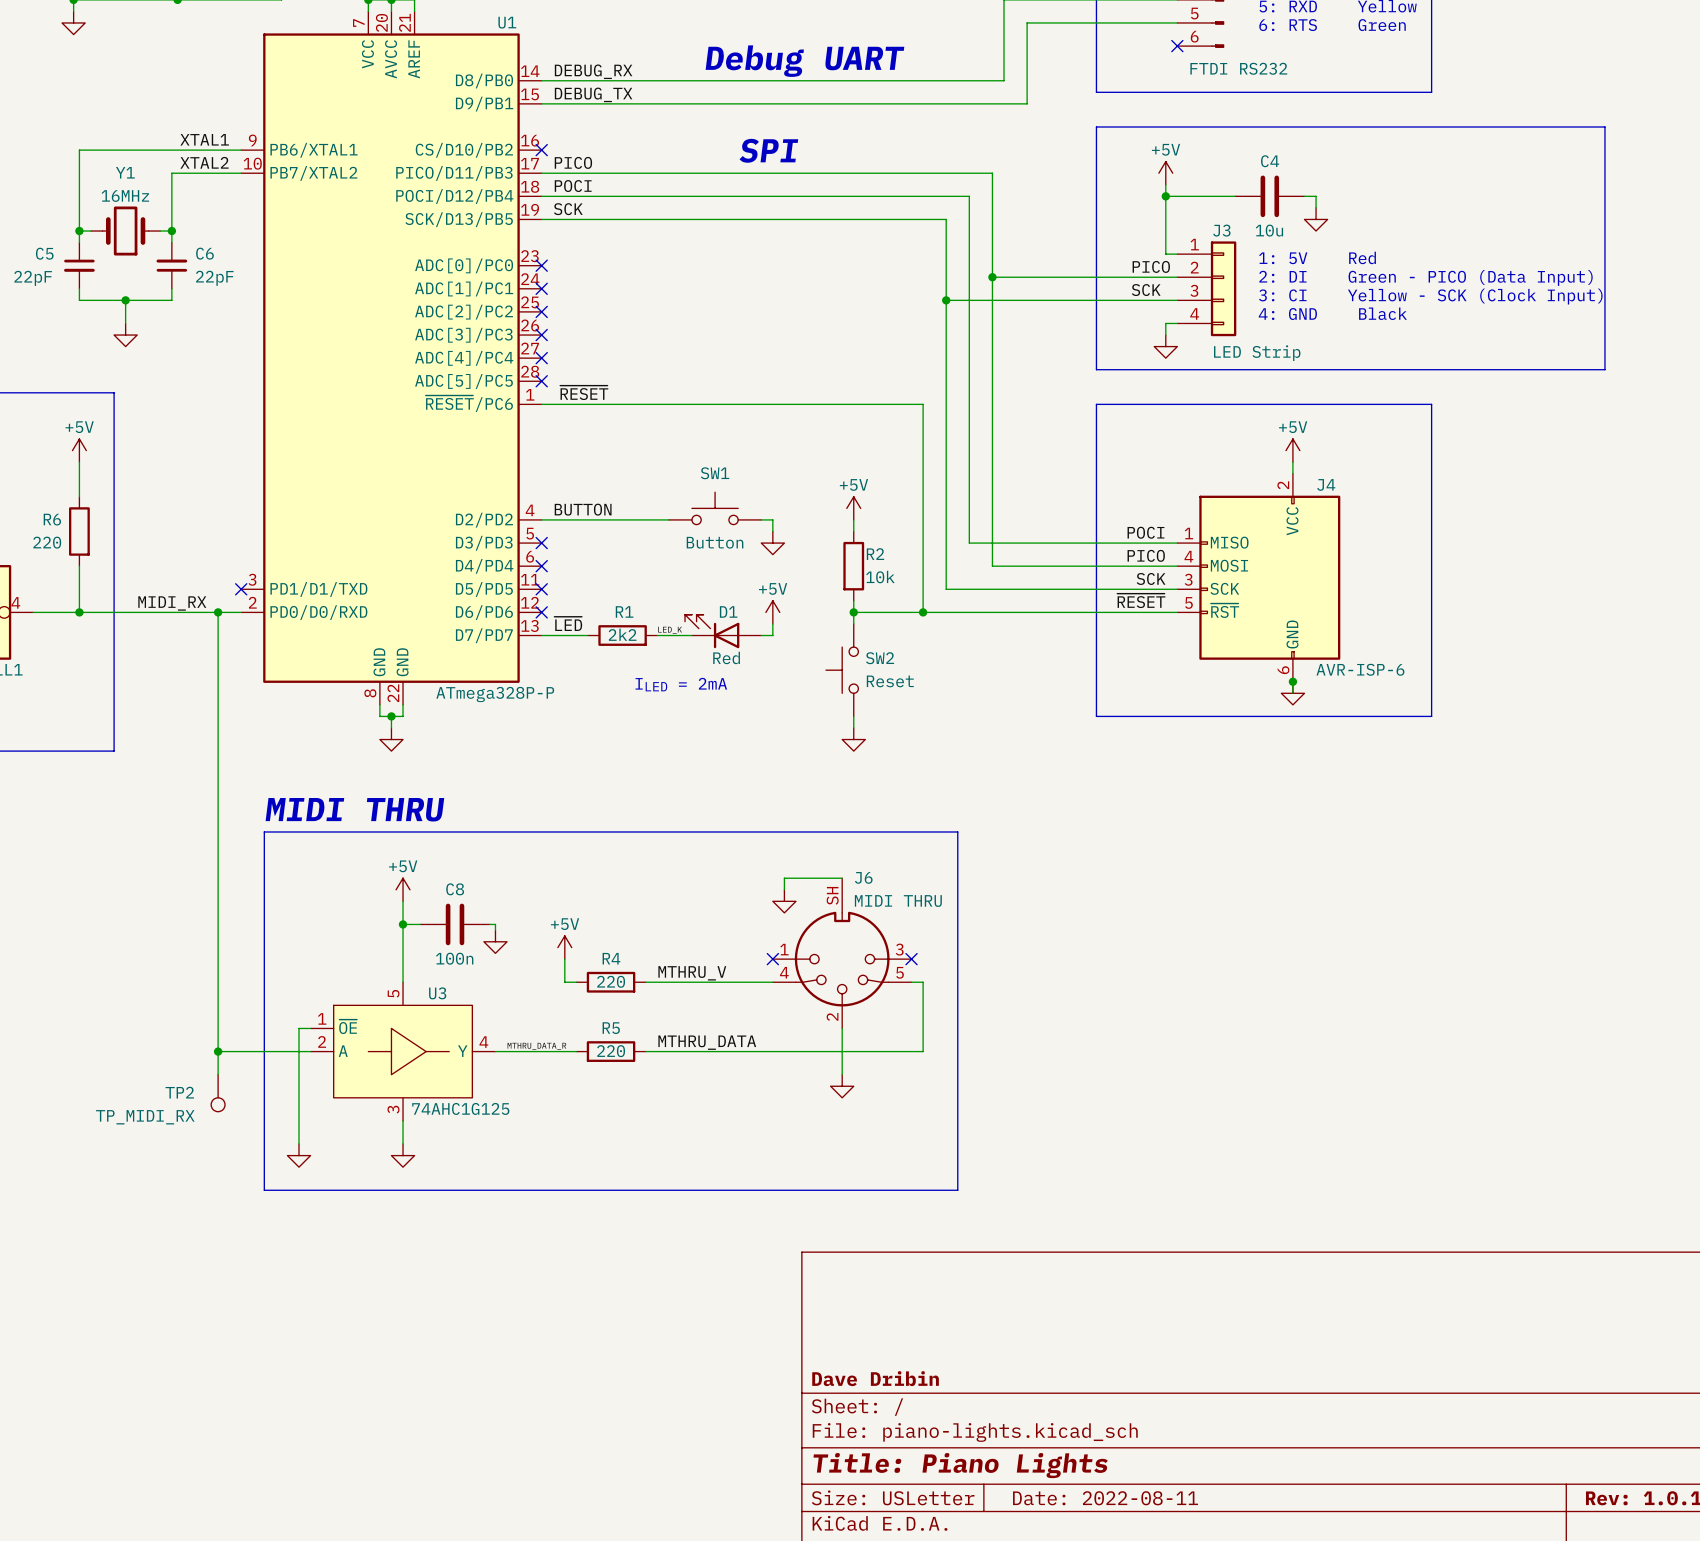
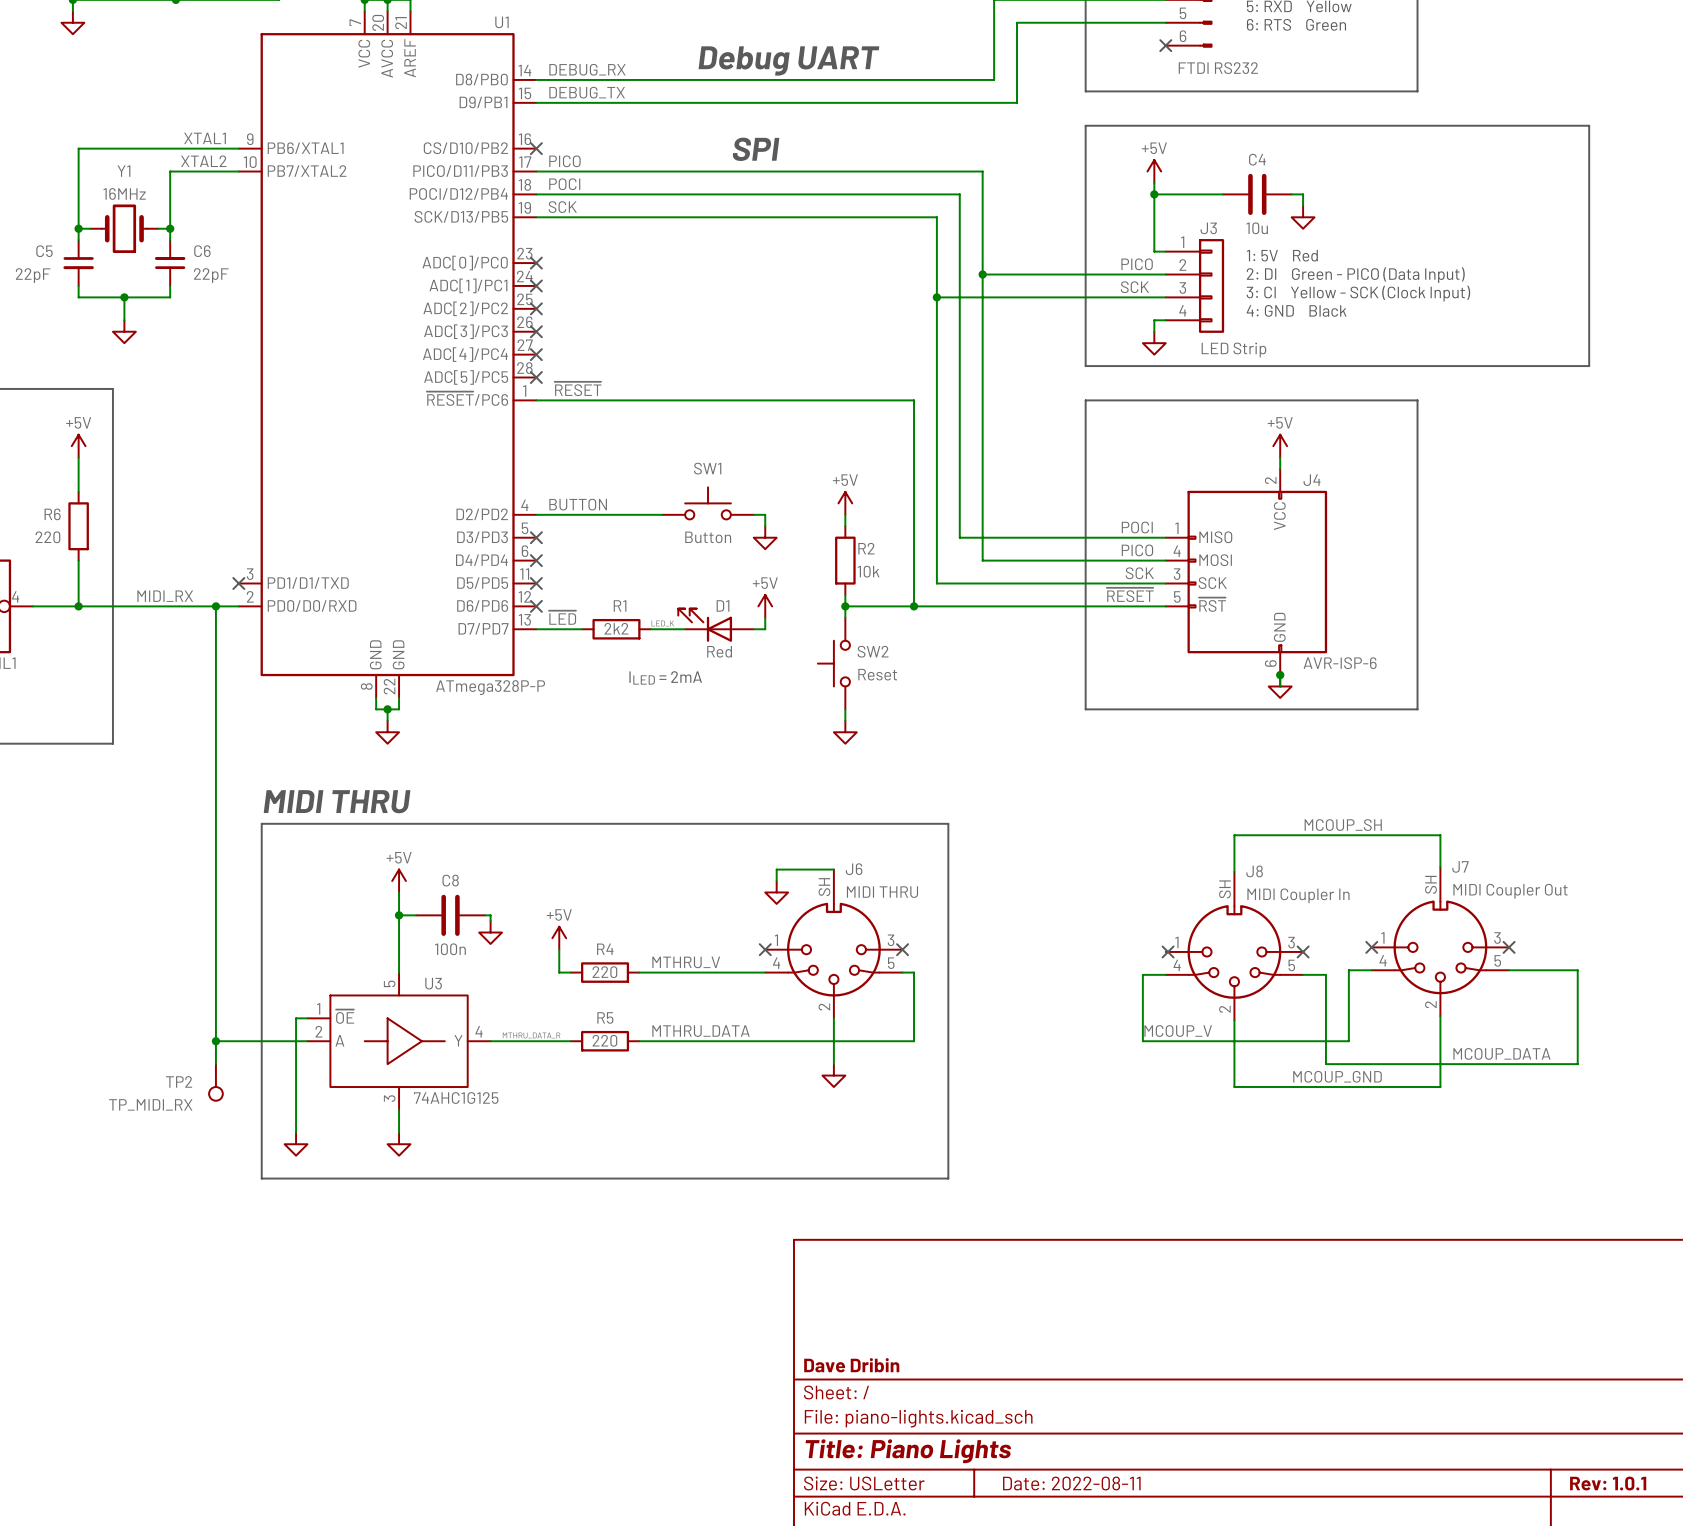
label: none -> MCOUP_SH (1343, 825)
wire: none -> (1440, 867) (1440, 835) (1234, 835) (1234, 871)
J7: none -> MIDI Coupler Out (1440, 941)
J8: none -> MIDI Coupler In (1234, 946)
no-connect mark: none -> (1371, 947)
no-connect mark: none -> (1509, 947)
no-connect mark: none -> (1168, 951)
no-connect mark: none -> (1303, 951)
wire: none -> (1371, 970) (1348, 970) (1348, 1041) (1142, 1041) (1142, 974) (1165, 974)
wire: none -> (1509, 970) (1577, 970) (1577, 1064) (1325, 1064) (1325, 974) (1303, 974)
wire: none -> (1440, 1016) (1440, 1087) (1234, 1087) (1234, 1020)
label: none -> MCOUP_V (1178, 1031)
label: none -> MCOUP_DATA (1501, 1053)
label: none -> MCOUP_GND (1337, 1076)

